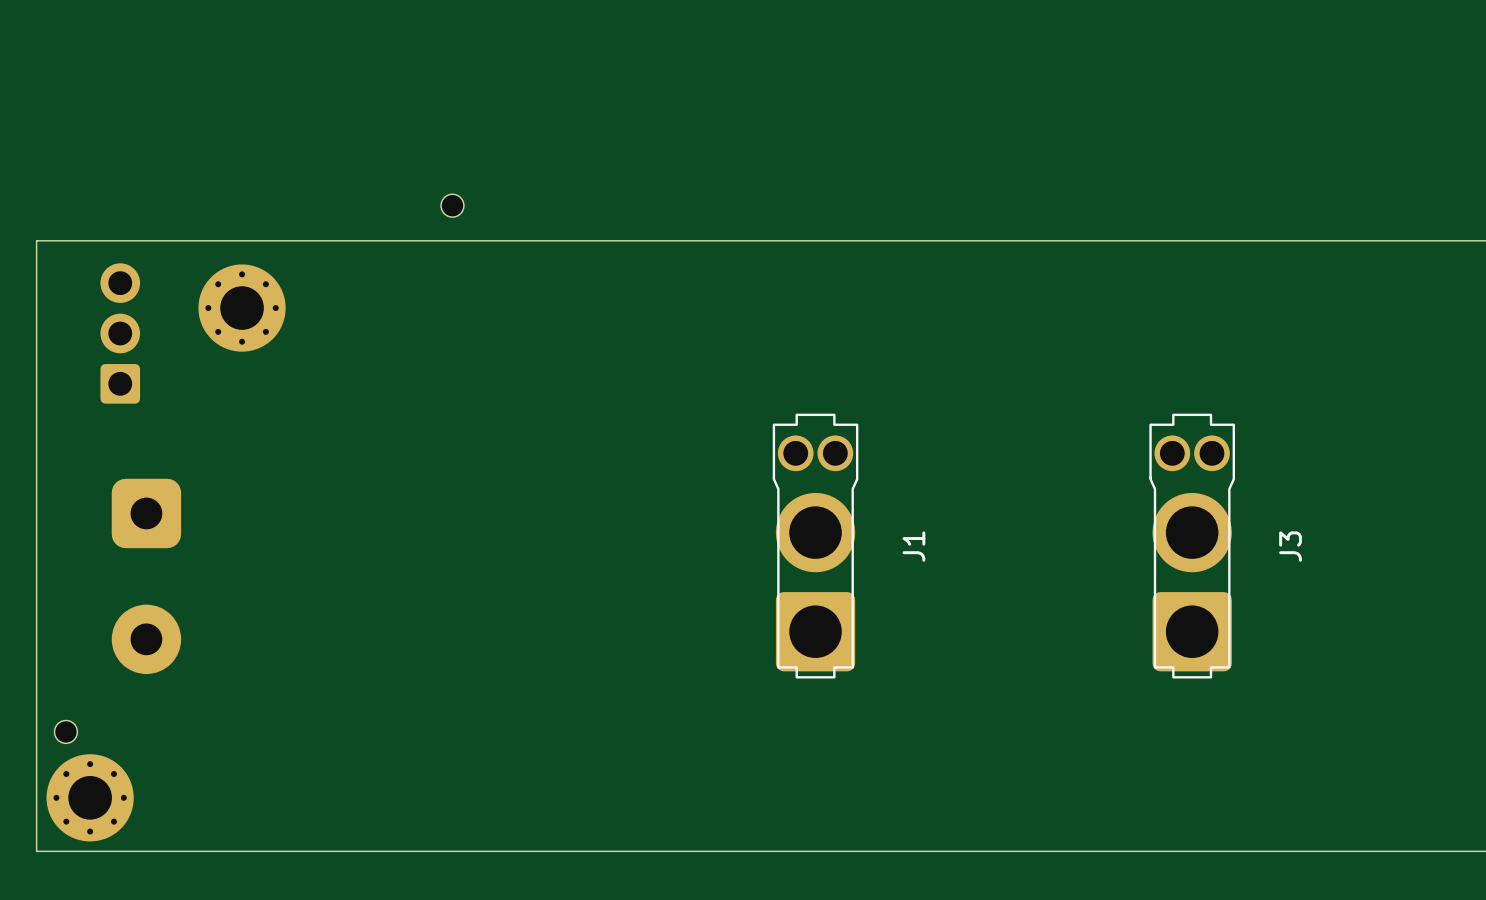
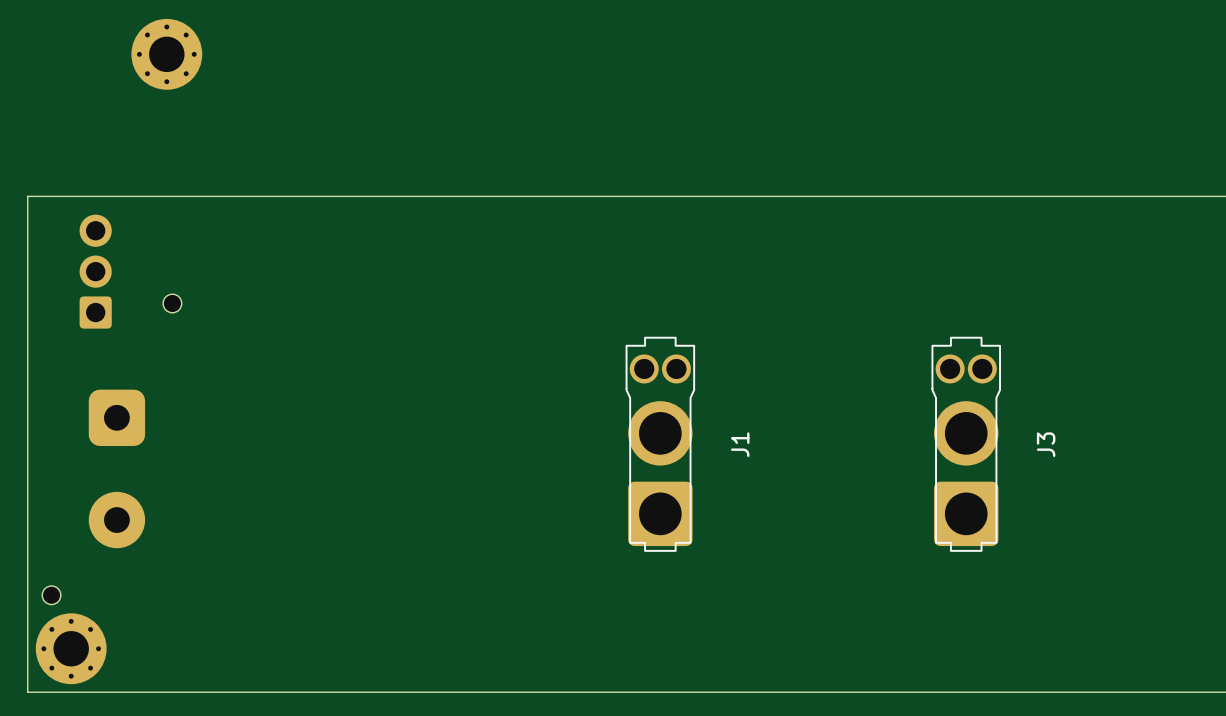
part position: (452, 205) -> (172, 303)
part position: (242, 308) -> (166, 54)

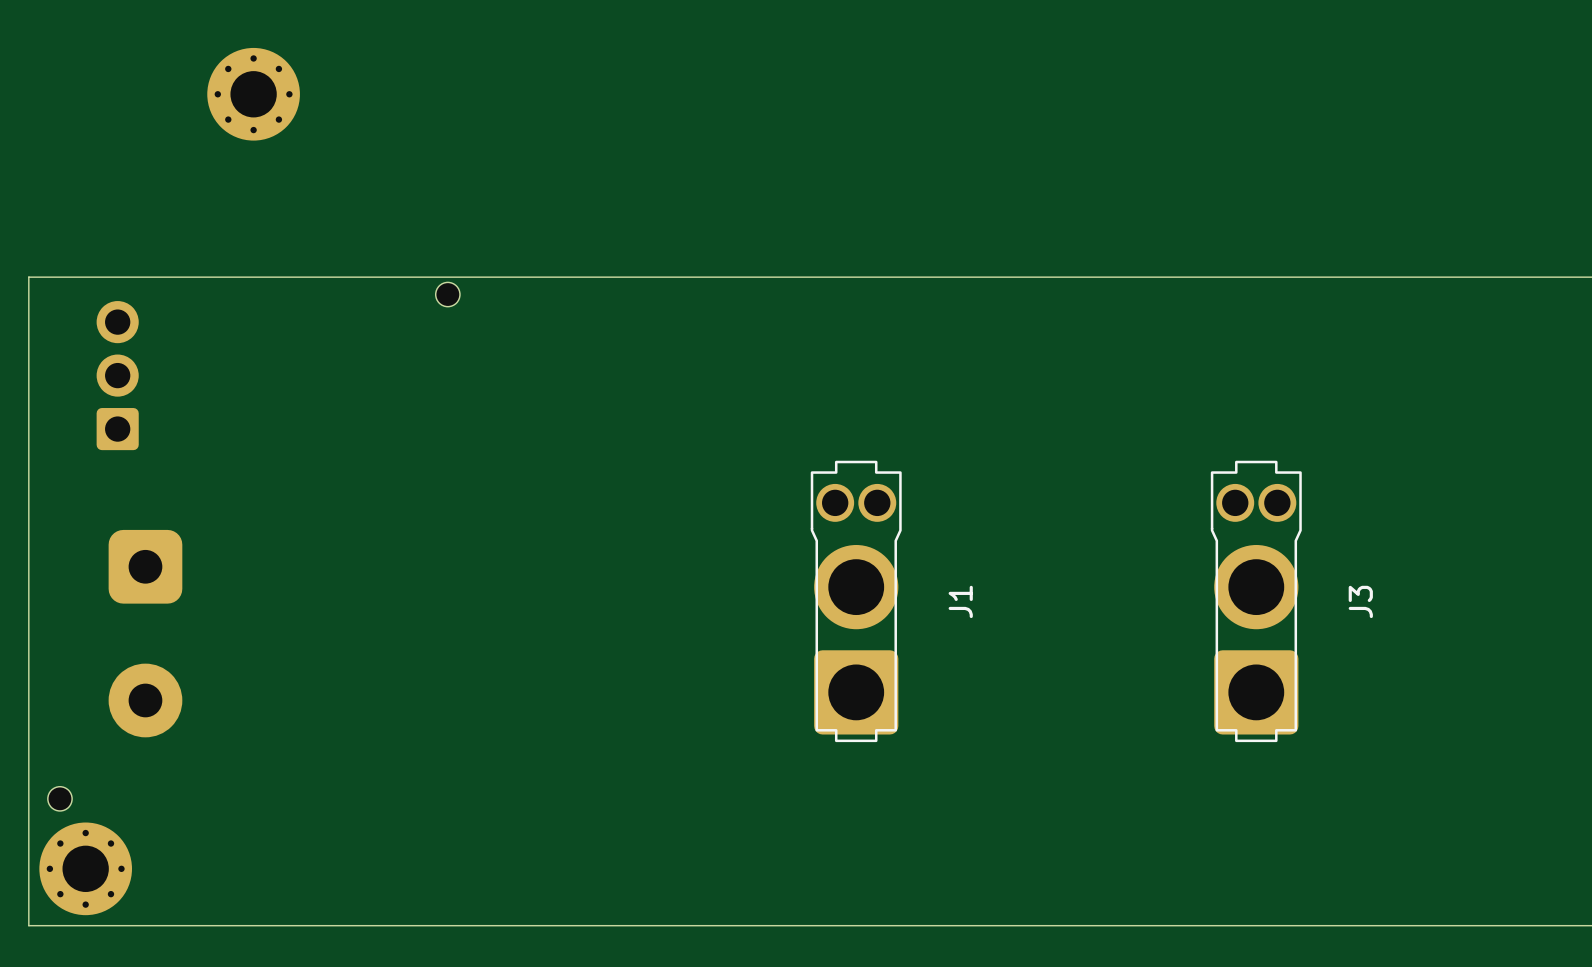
part position: (166, 54) -> (253, 94)
part position: (172, 303) -> (447, 294)

